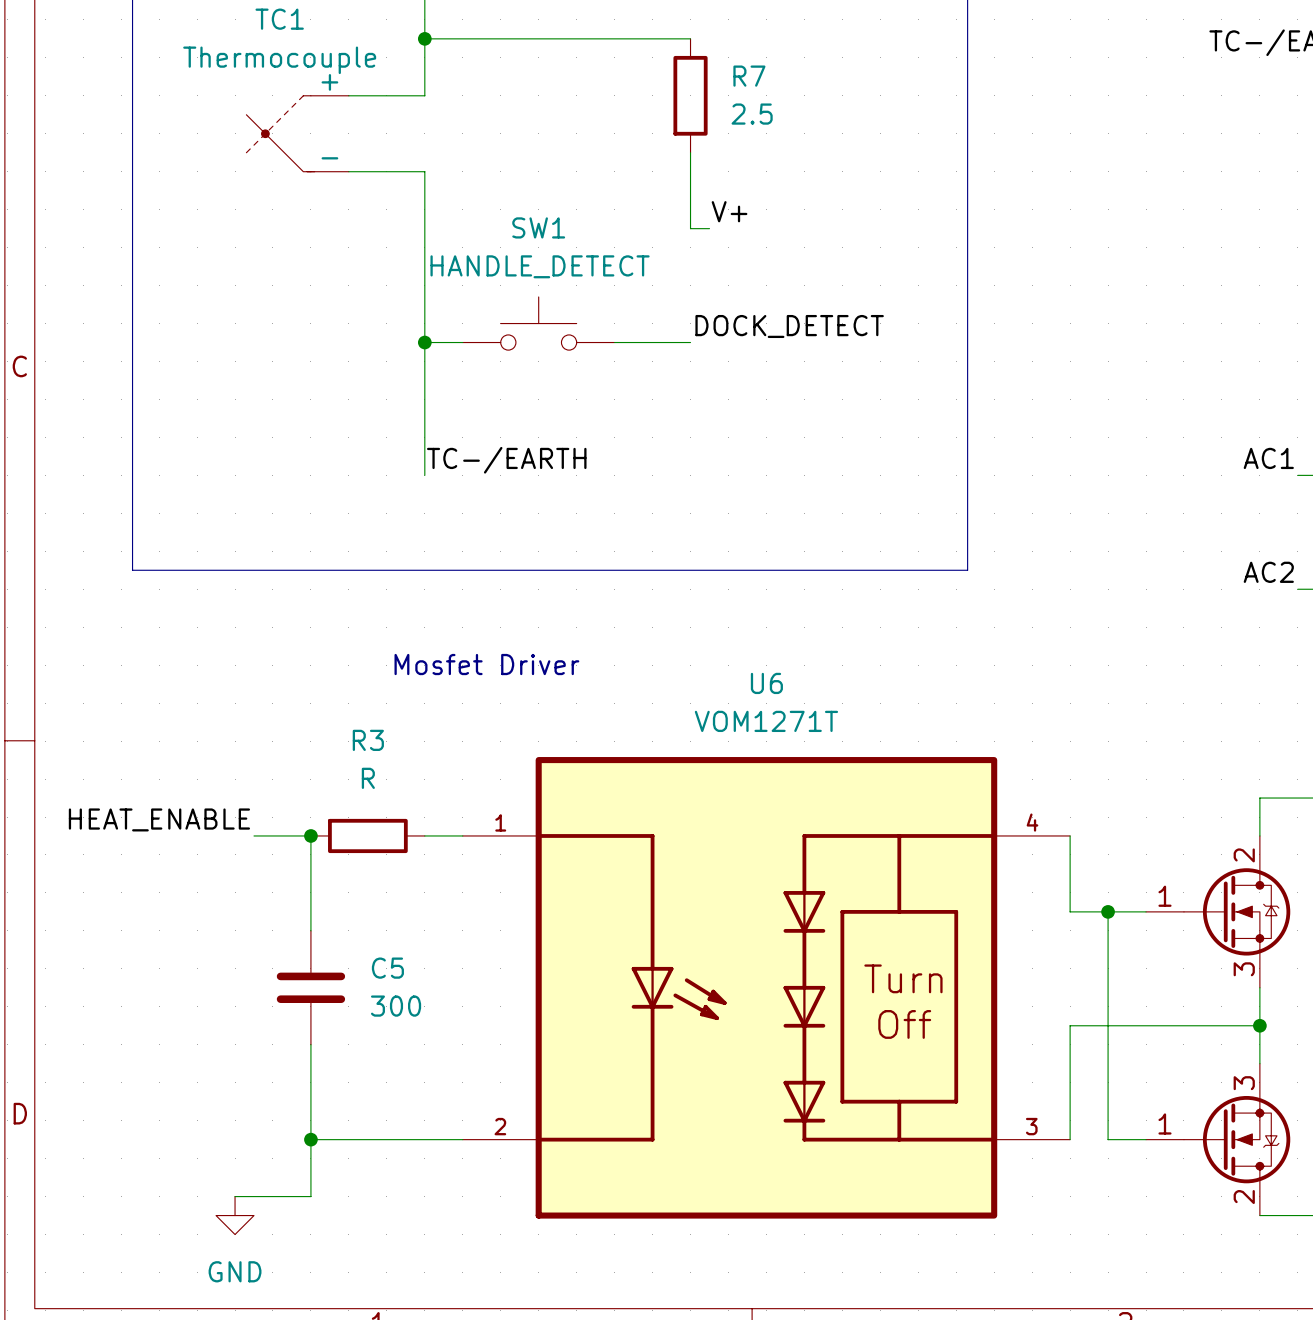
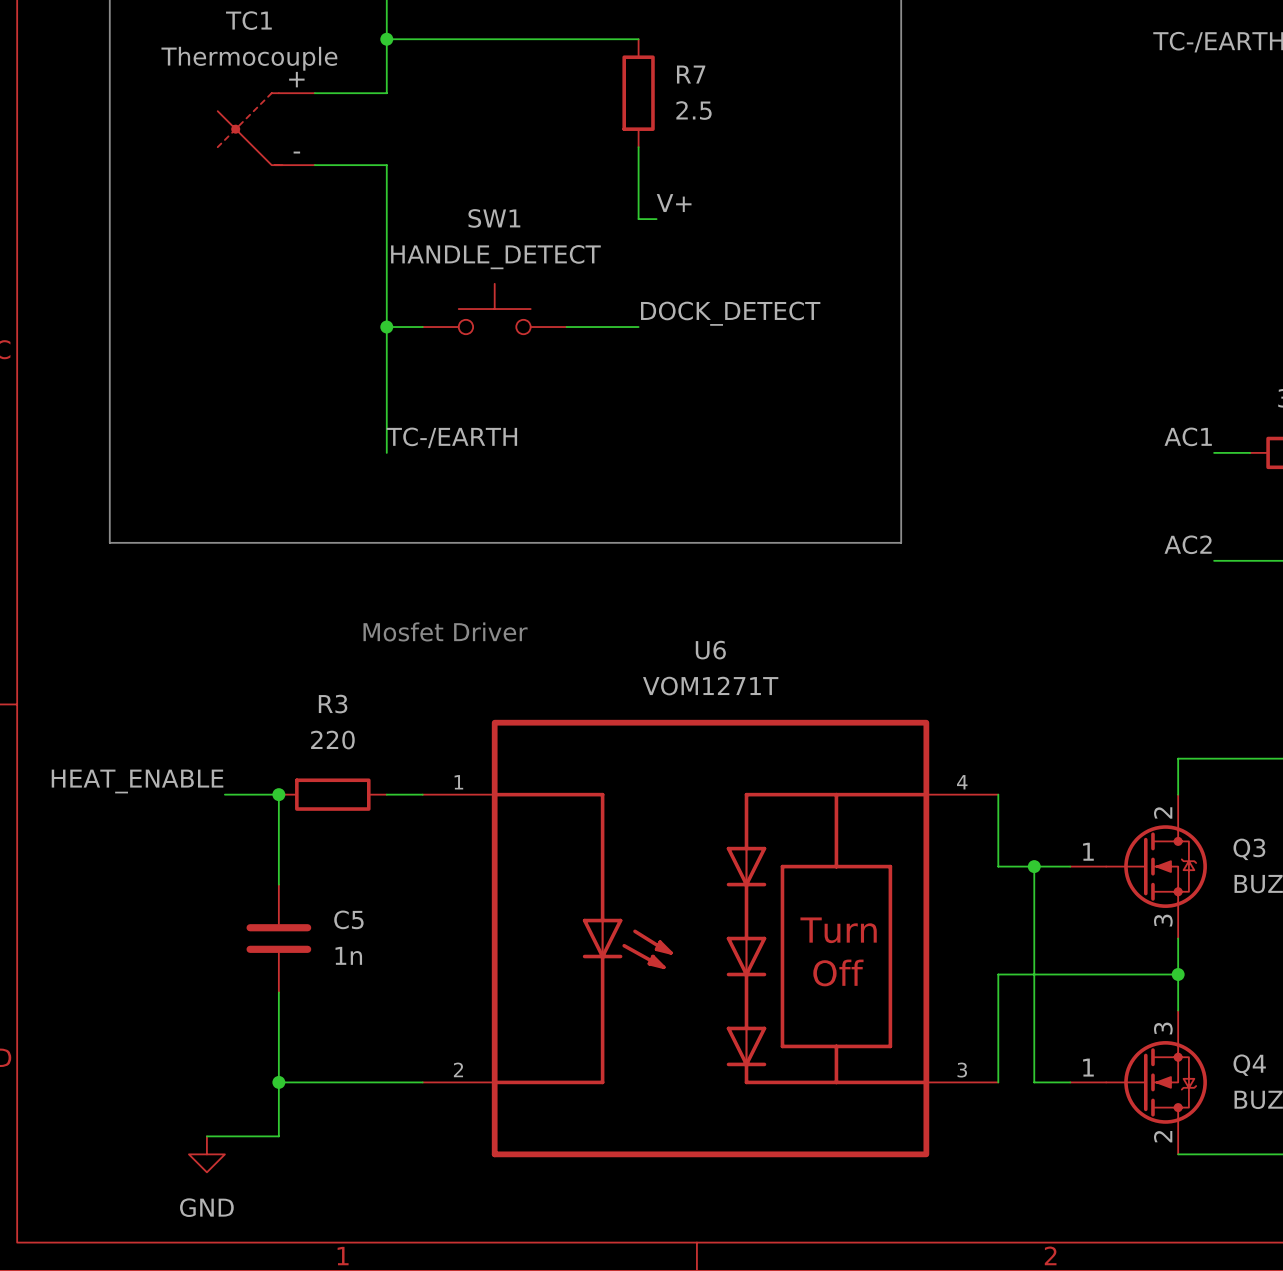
R3 value: R (368, 778) -> 220 (332, 740)
C5 value: 300 (396, 1006) -> 1n (348, 955)

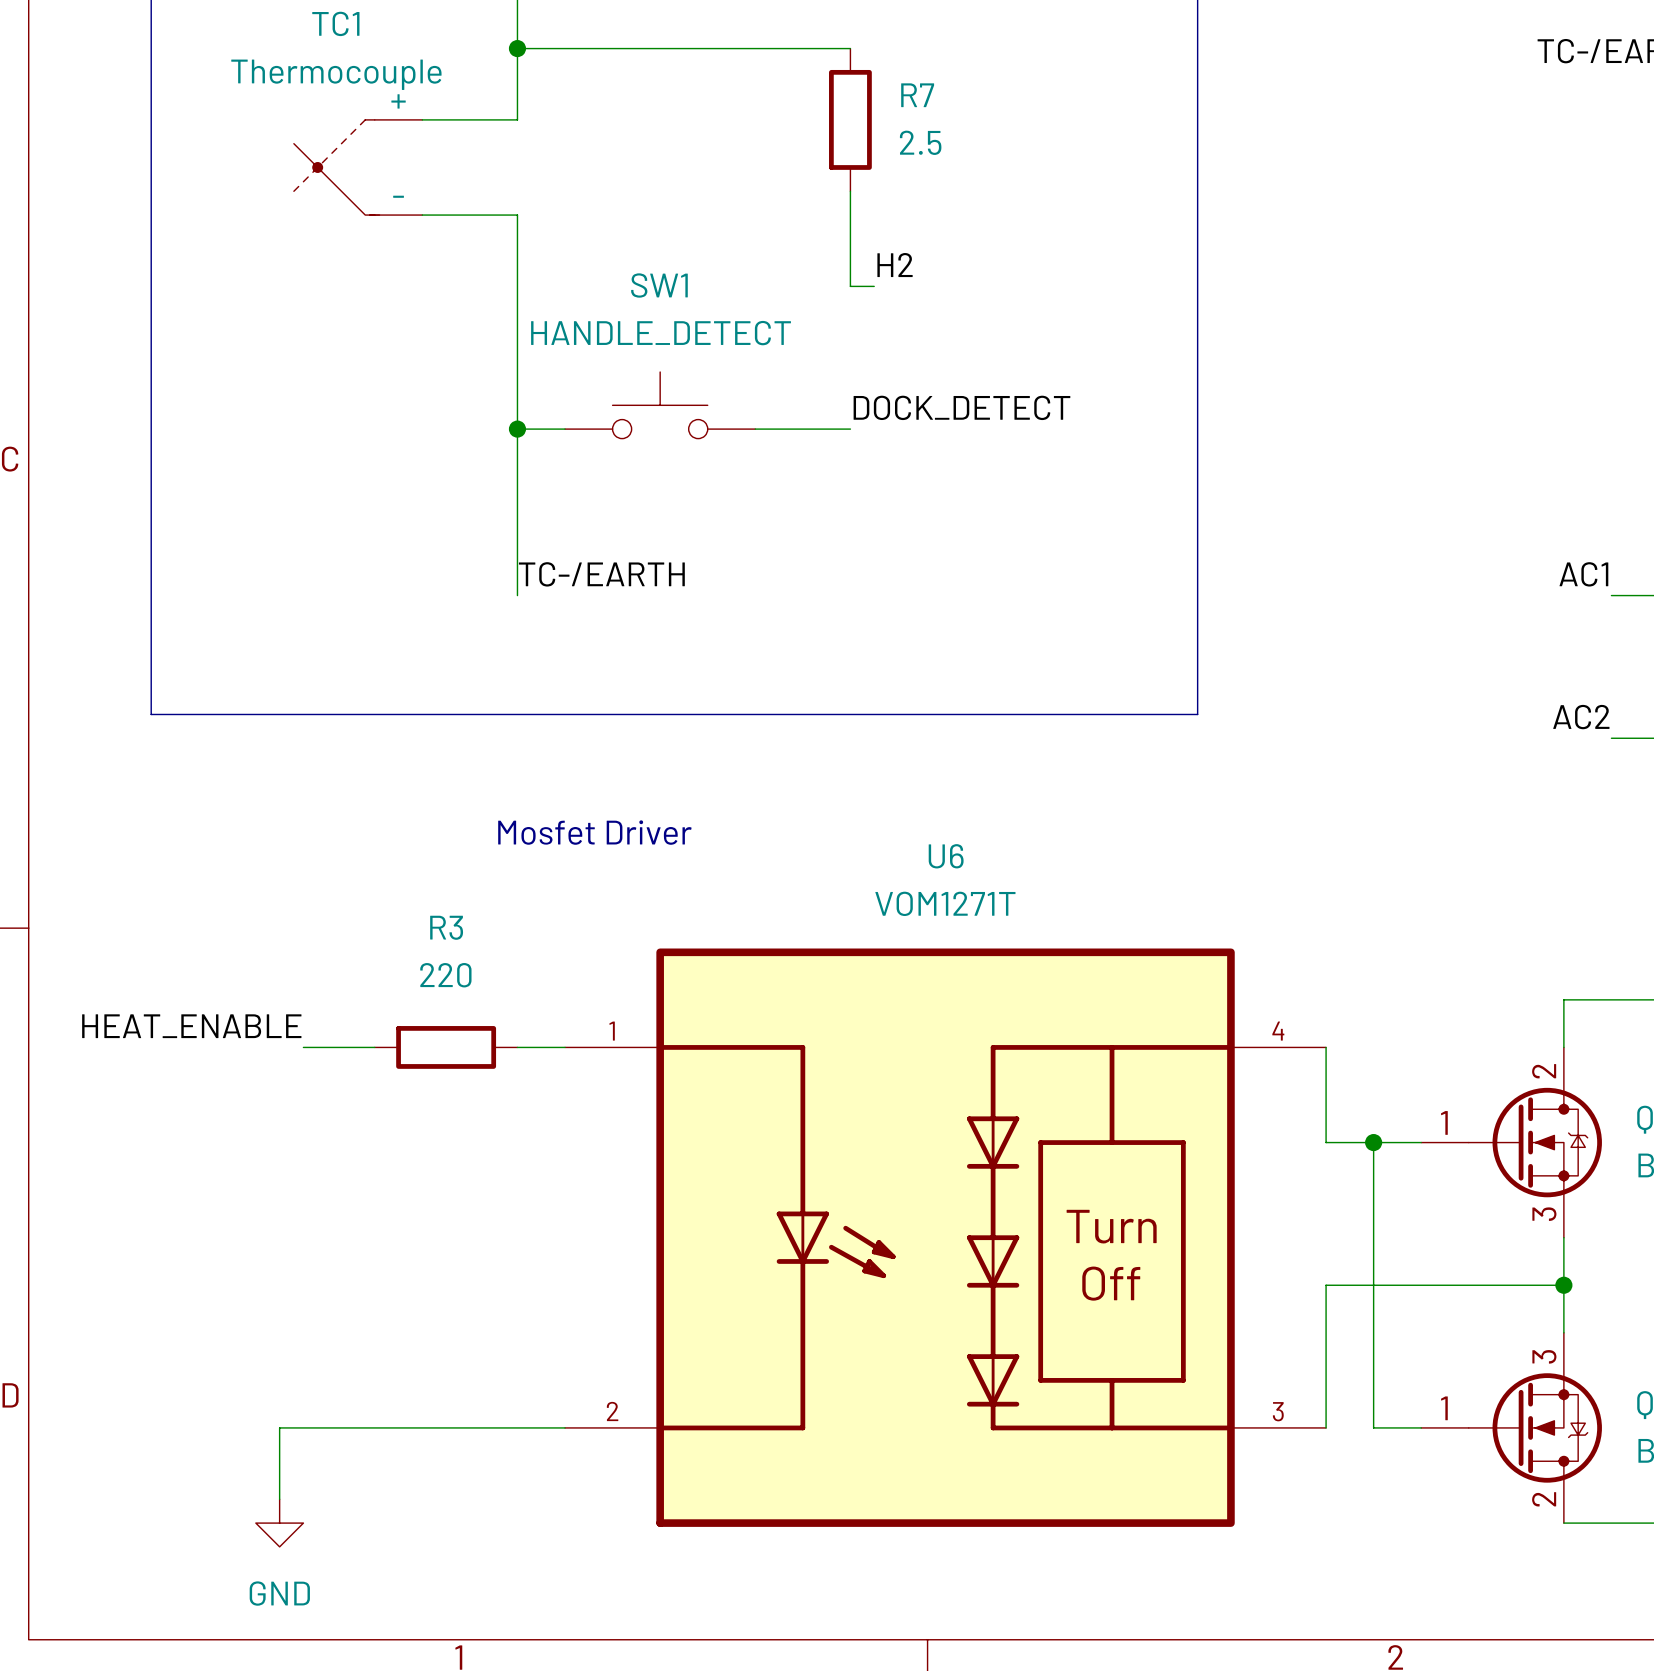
label: V+ (674, 203) -> H2 (895, 265)
wire: (278, 794) (278, 884) -> none
junction: (278, 794) -> none
C5: 1n (278, 938) -> none
wire: (278, 992) (278, 1136) (206, 1136) -> (374, 1427) (279, 1427) (279, 1499)
junction: (278, 1082) -> none

